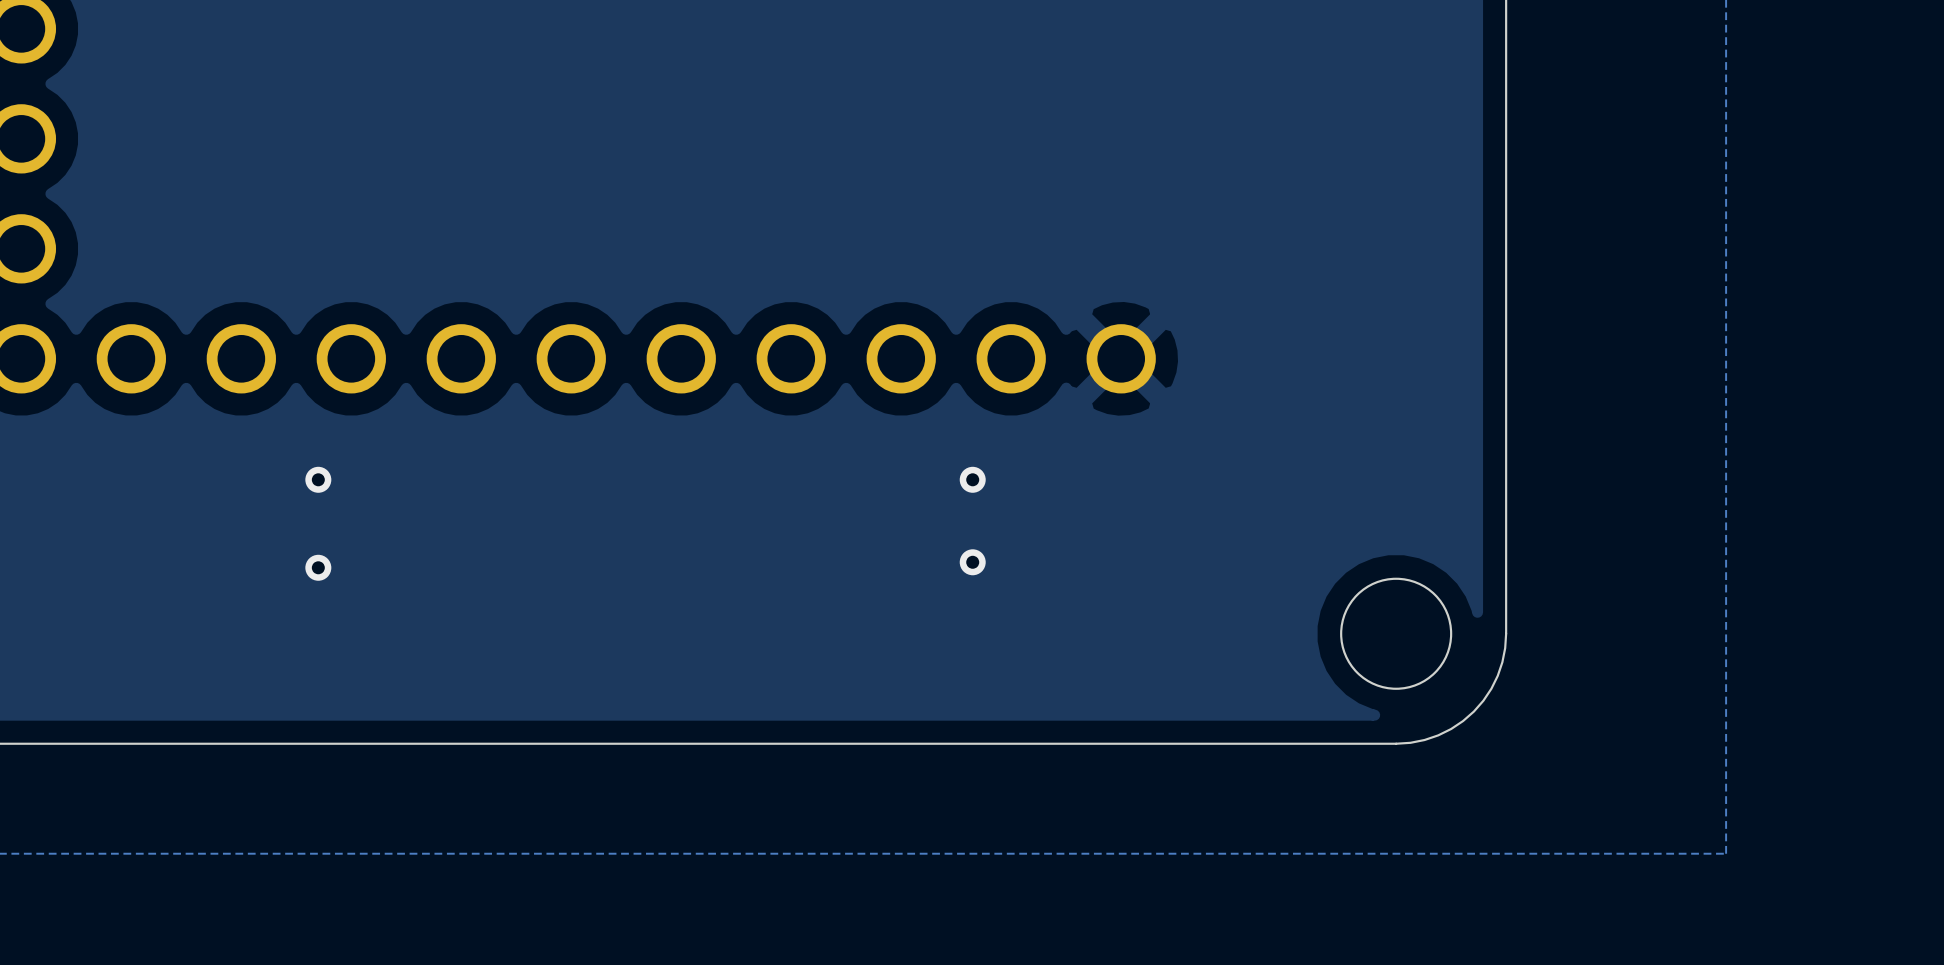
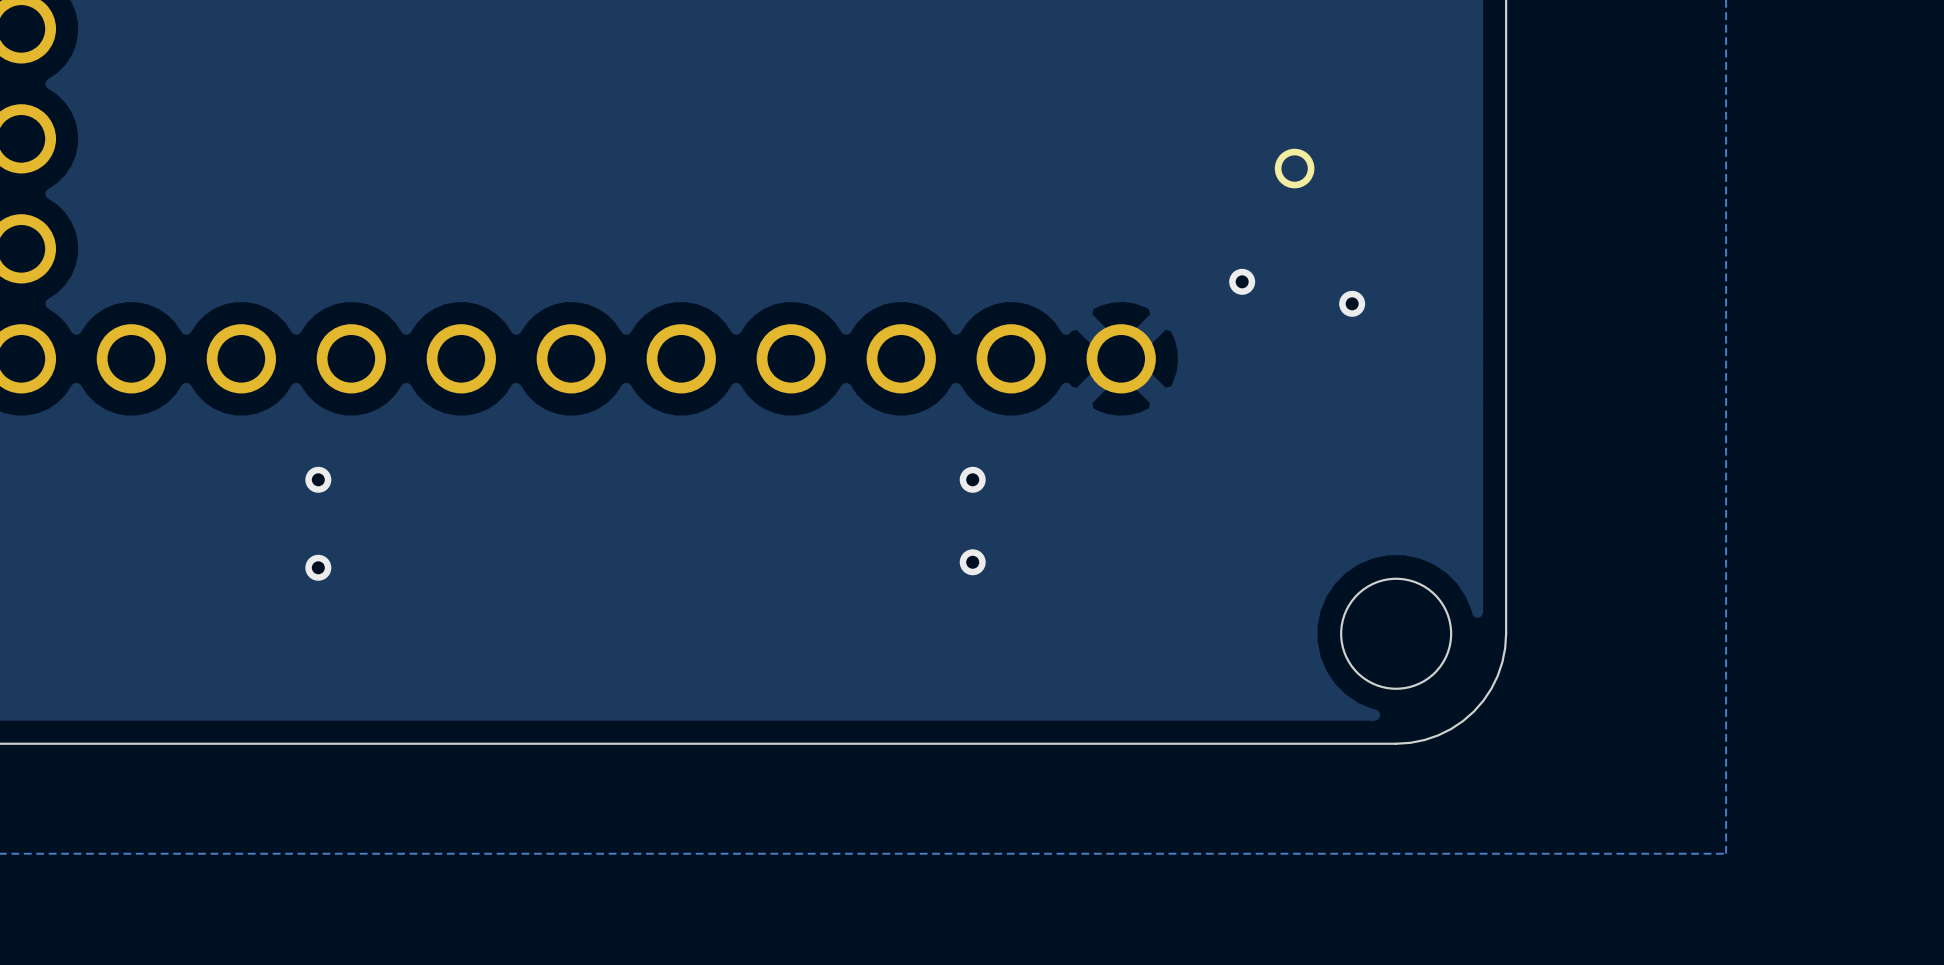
part: none -> (1294, 168)
via: none -> (1242, 281)
via: none -> (1352, 303)

